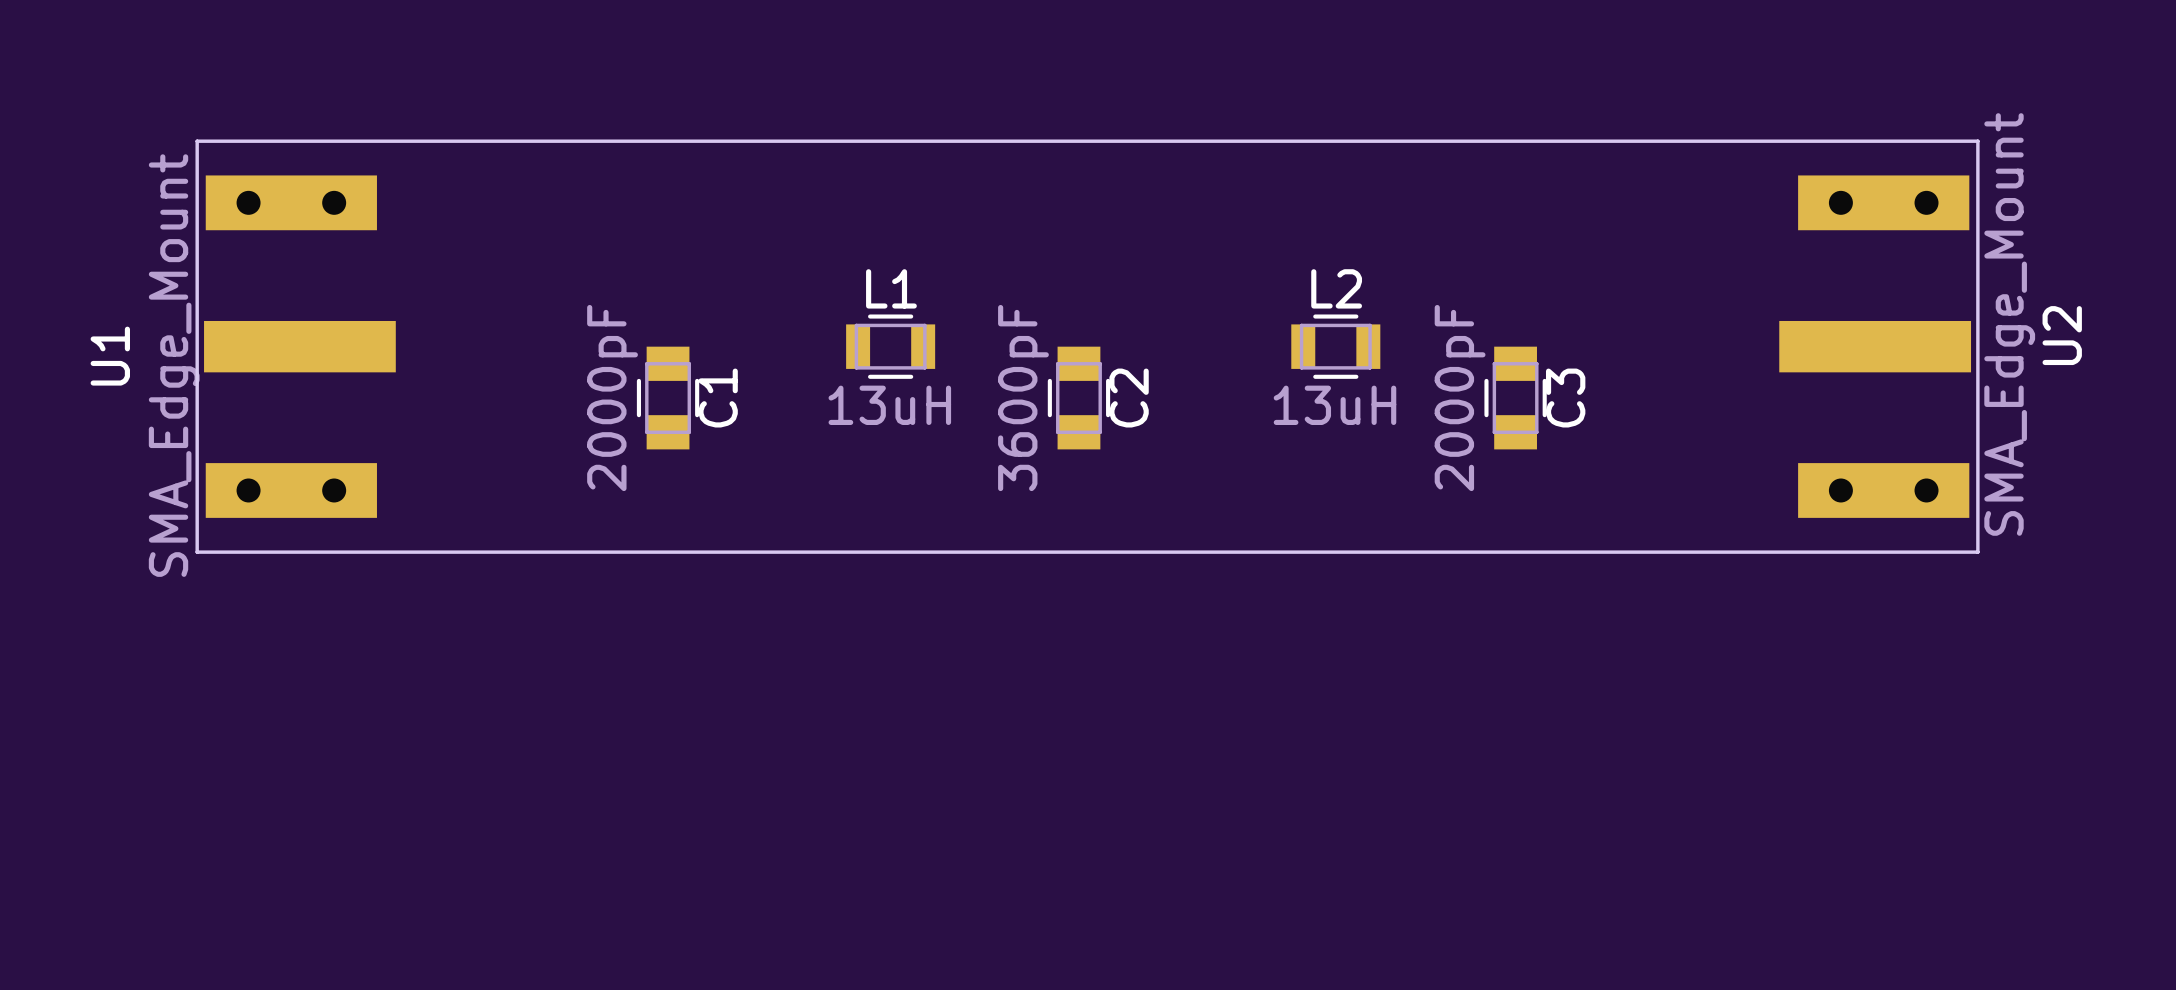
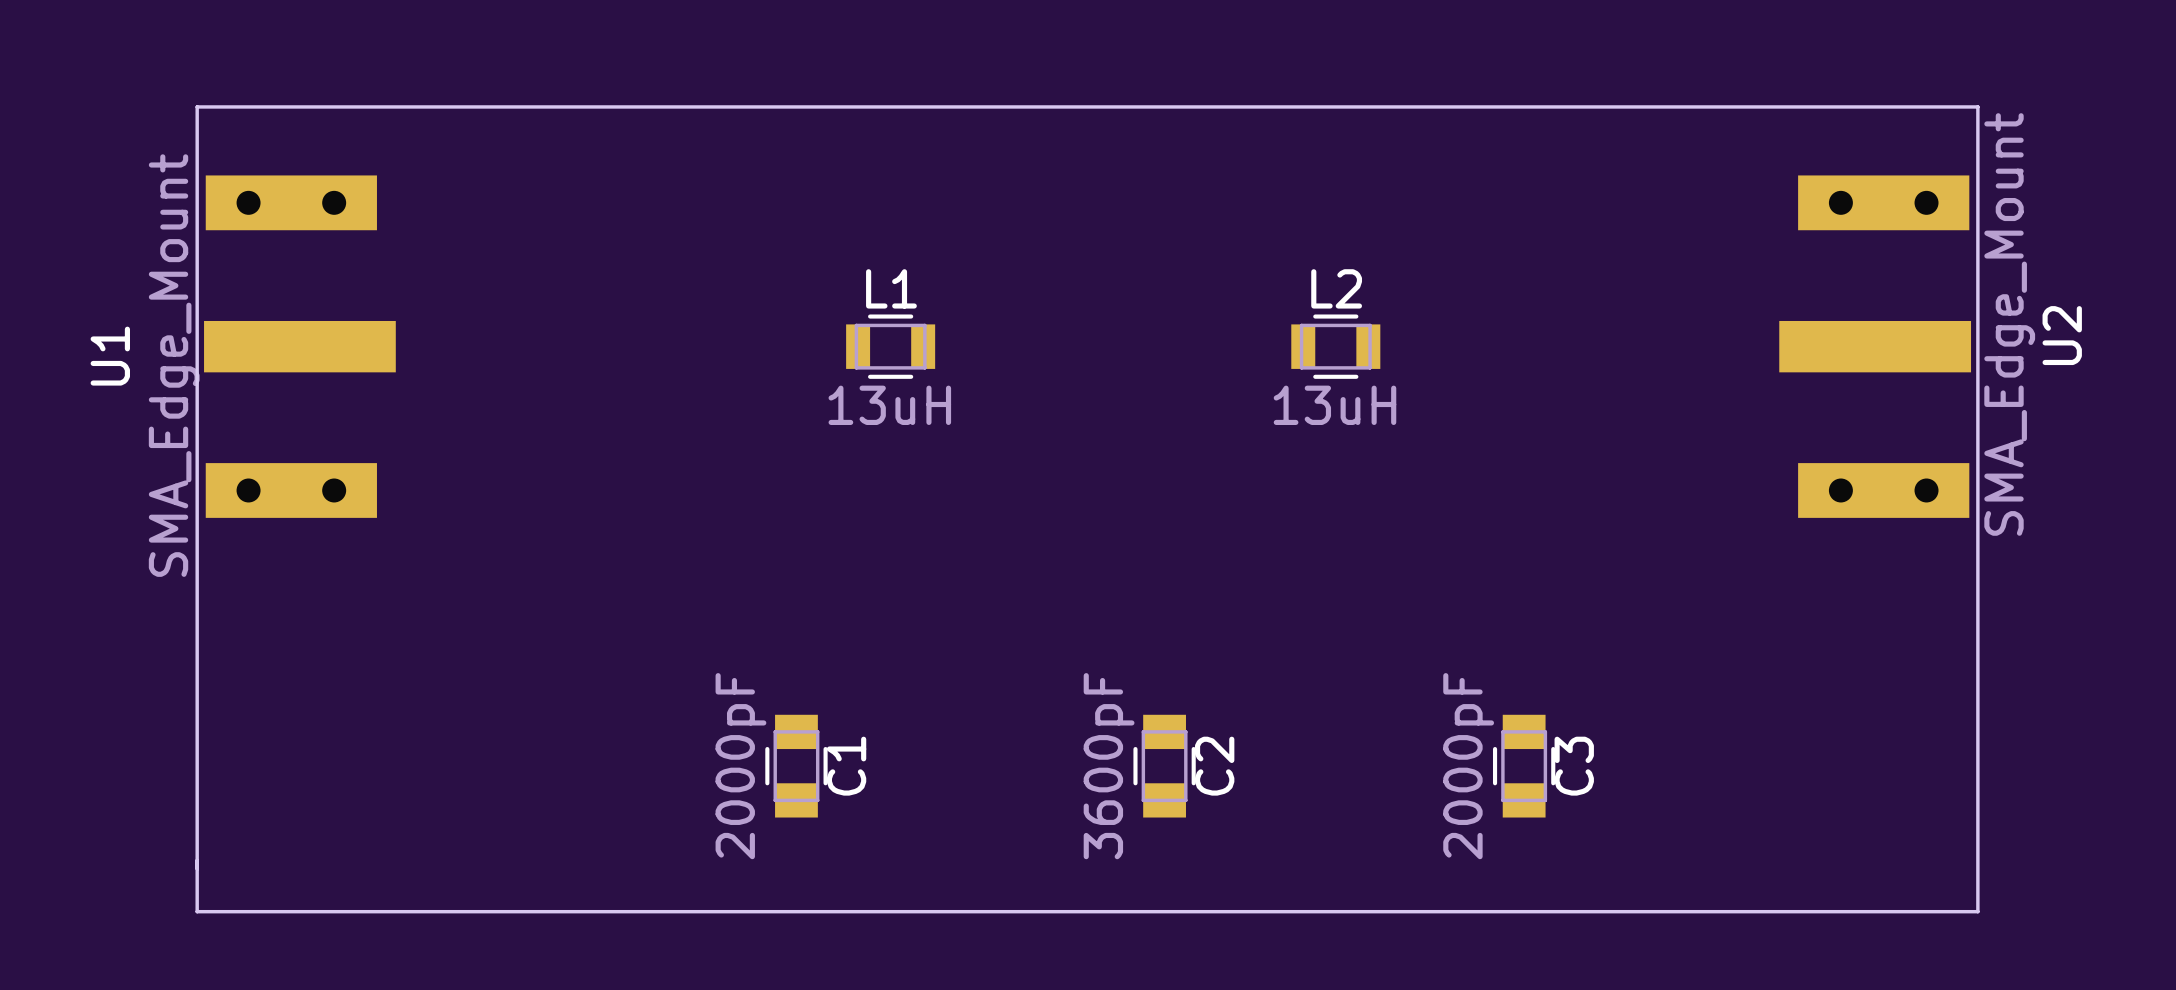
board edge: (197, 141) (1977, 141) -> (197, 141) (197, 106) (1977, 106) (1977, 141)
C1 position: (668, 398) -> (796, 766)
C2 position: (1078, 398) -> (1164, 766)
C3 position: (1515, 398) -> (1524, 766)
board edge: (197, 552) (1977, 552) -> (197, 552) (197, 911) (1977, 911) (1977, 552)

